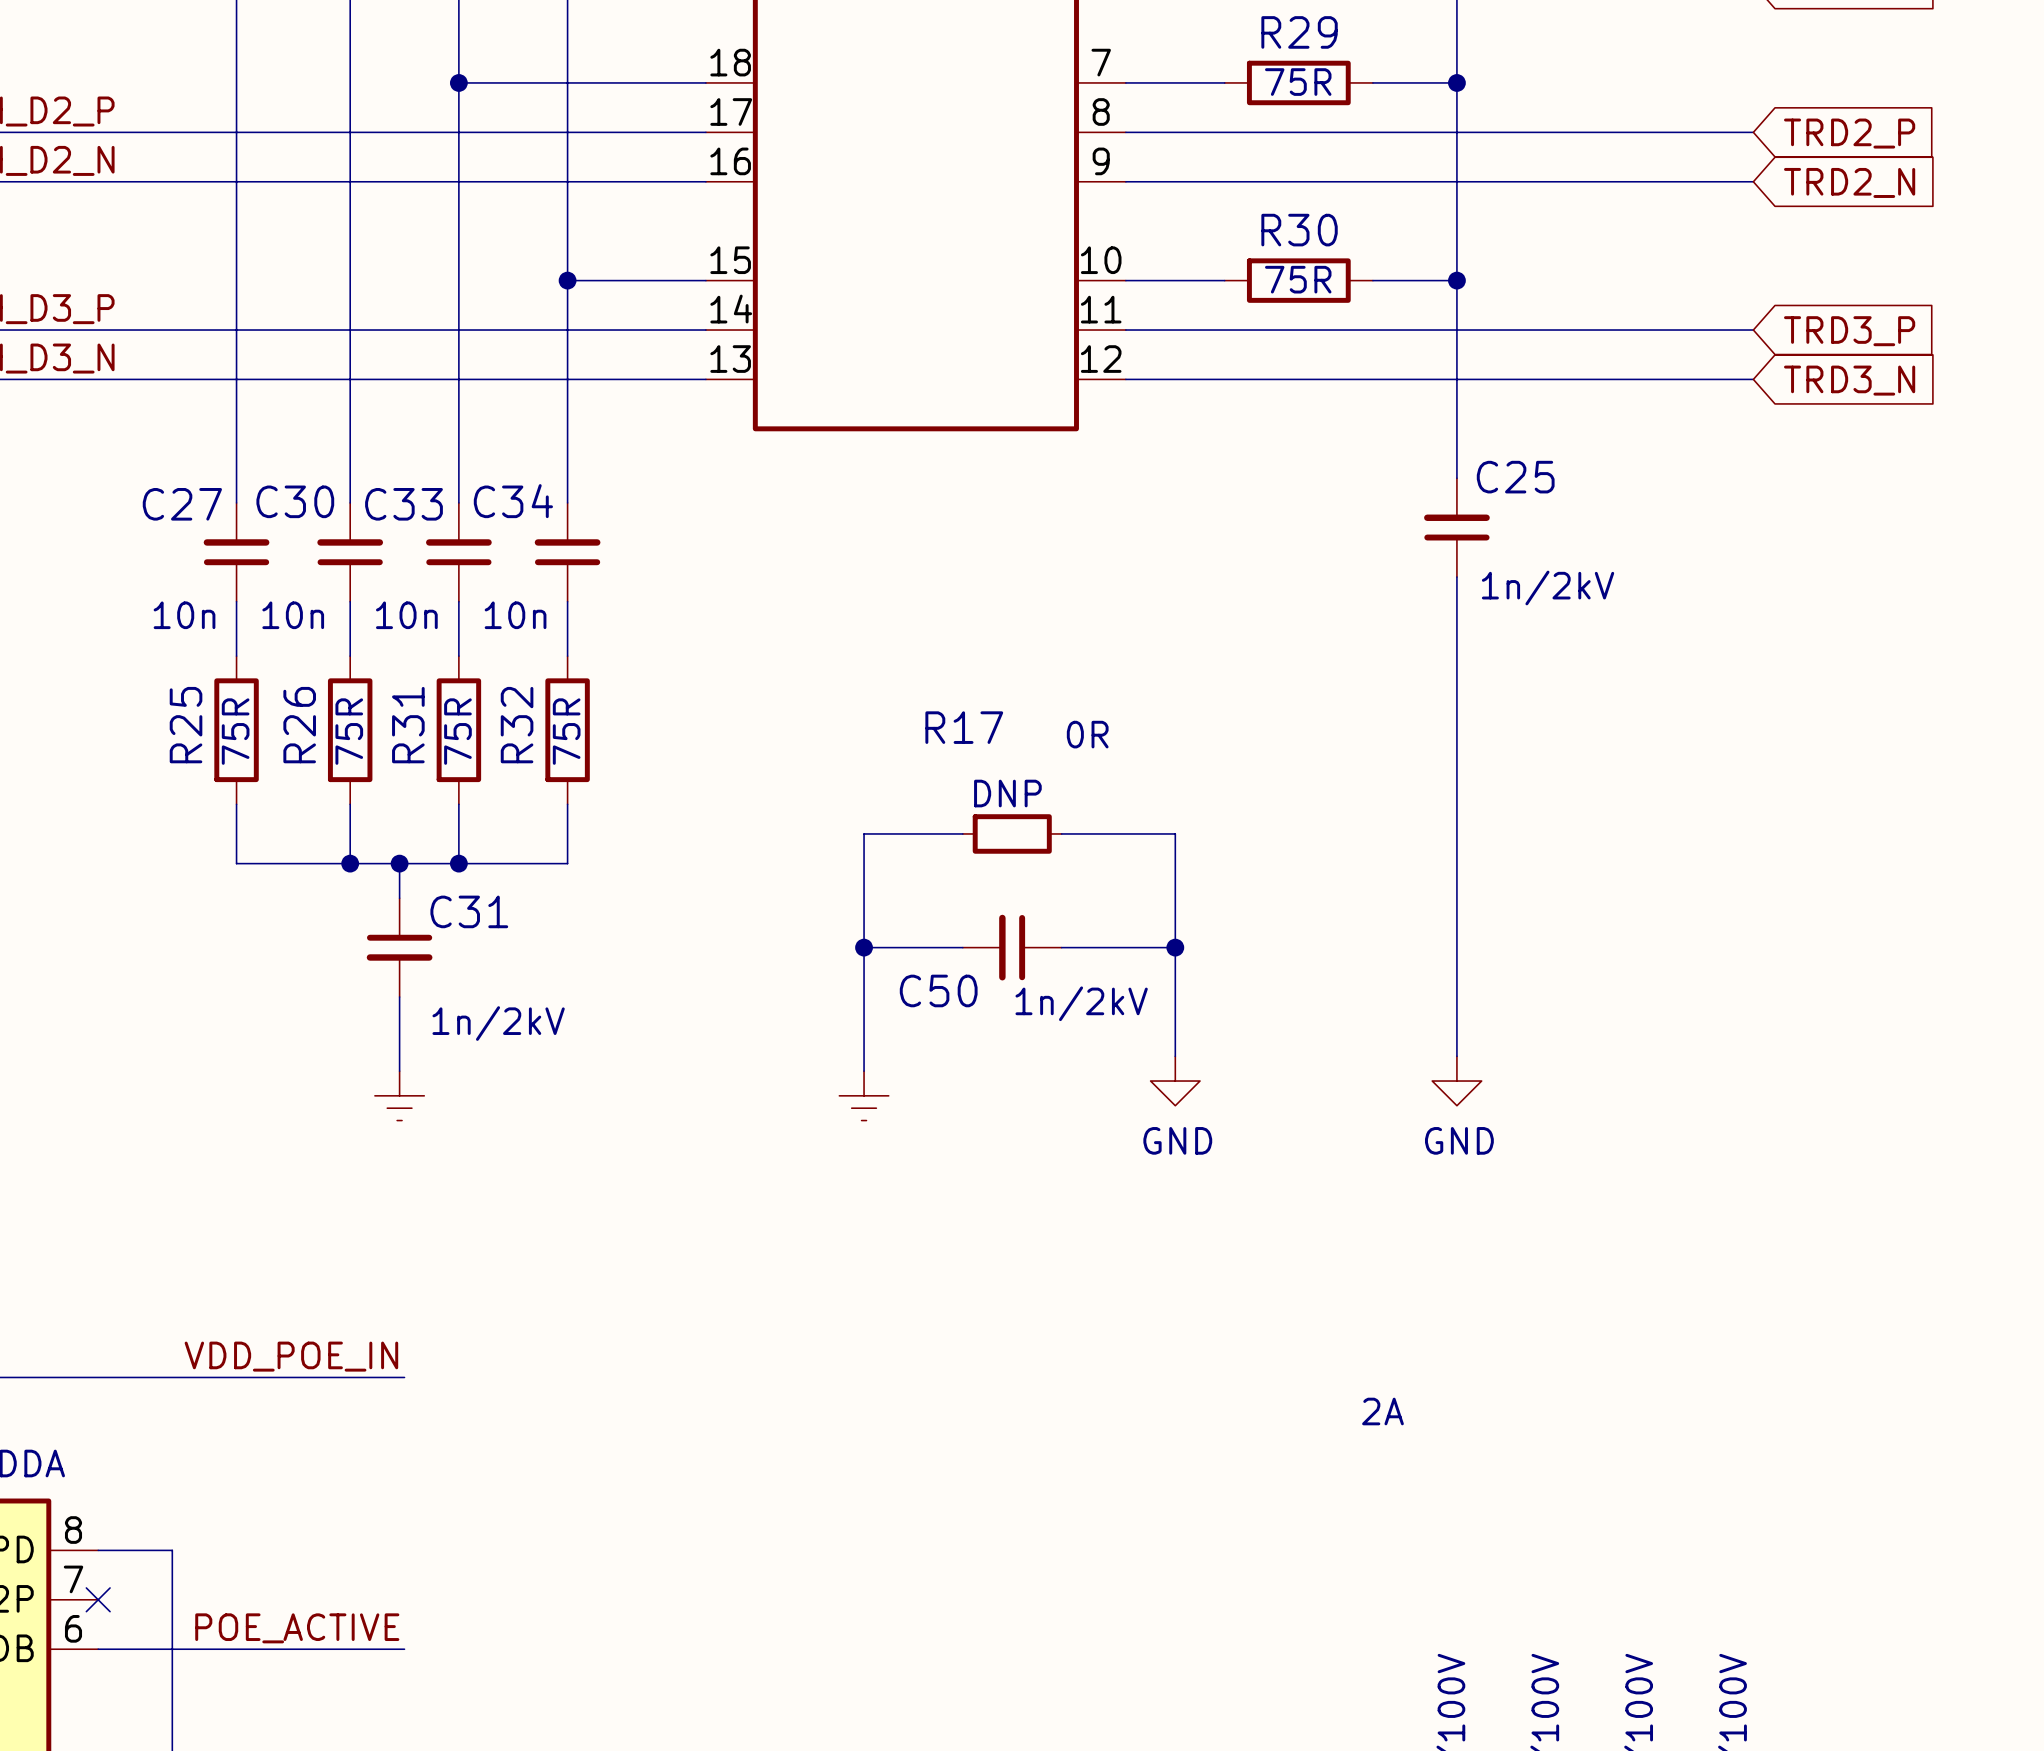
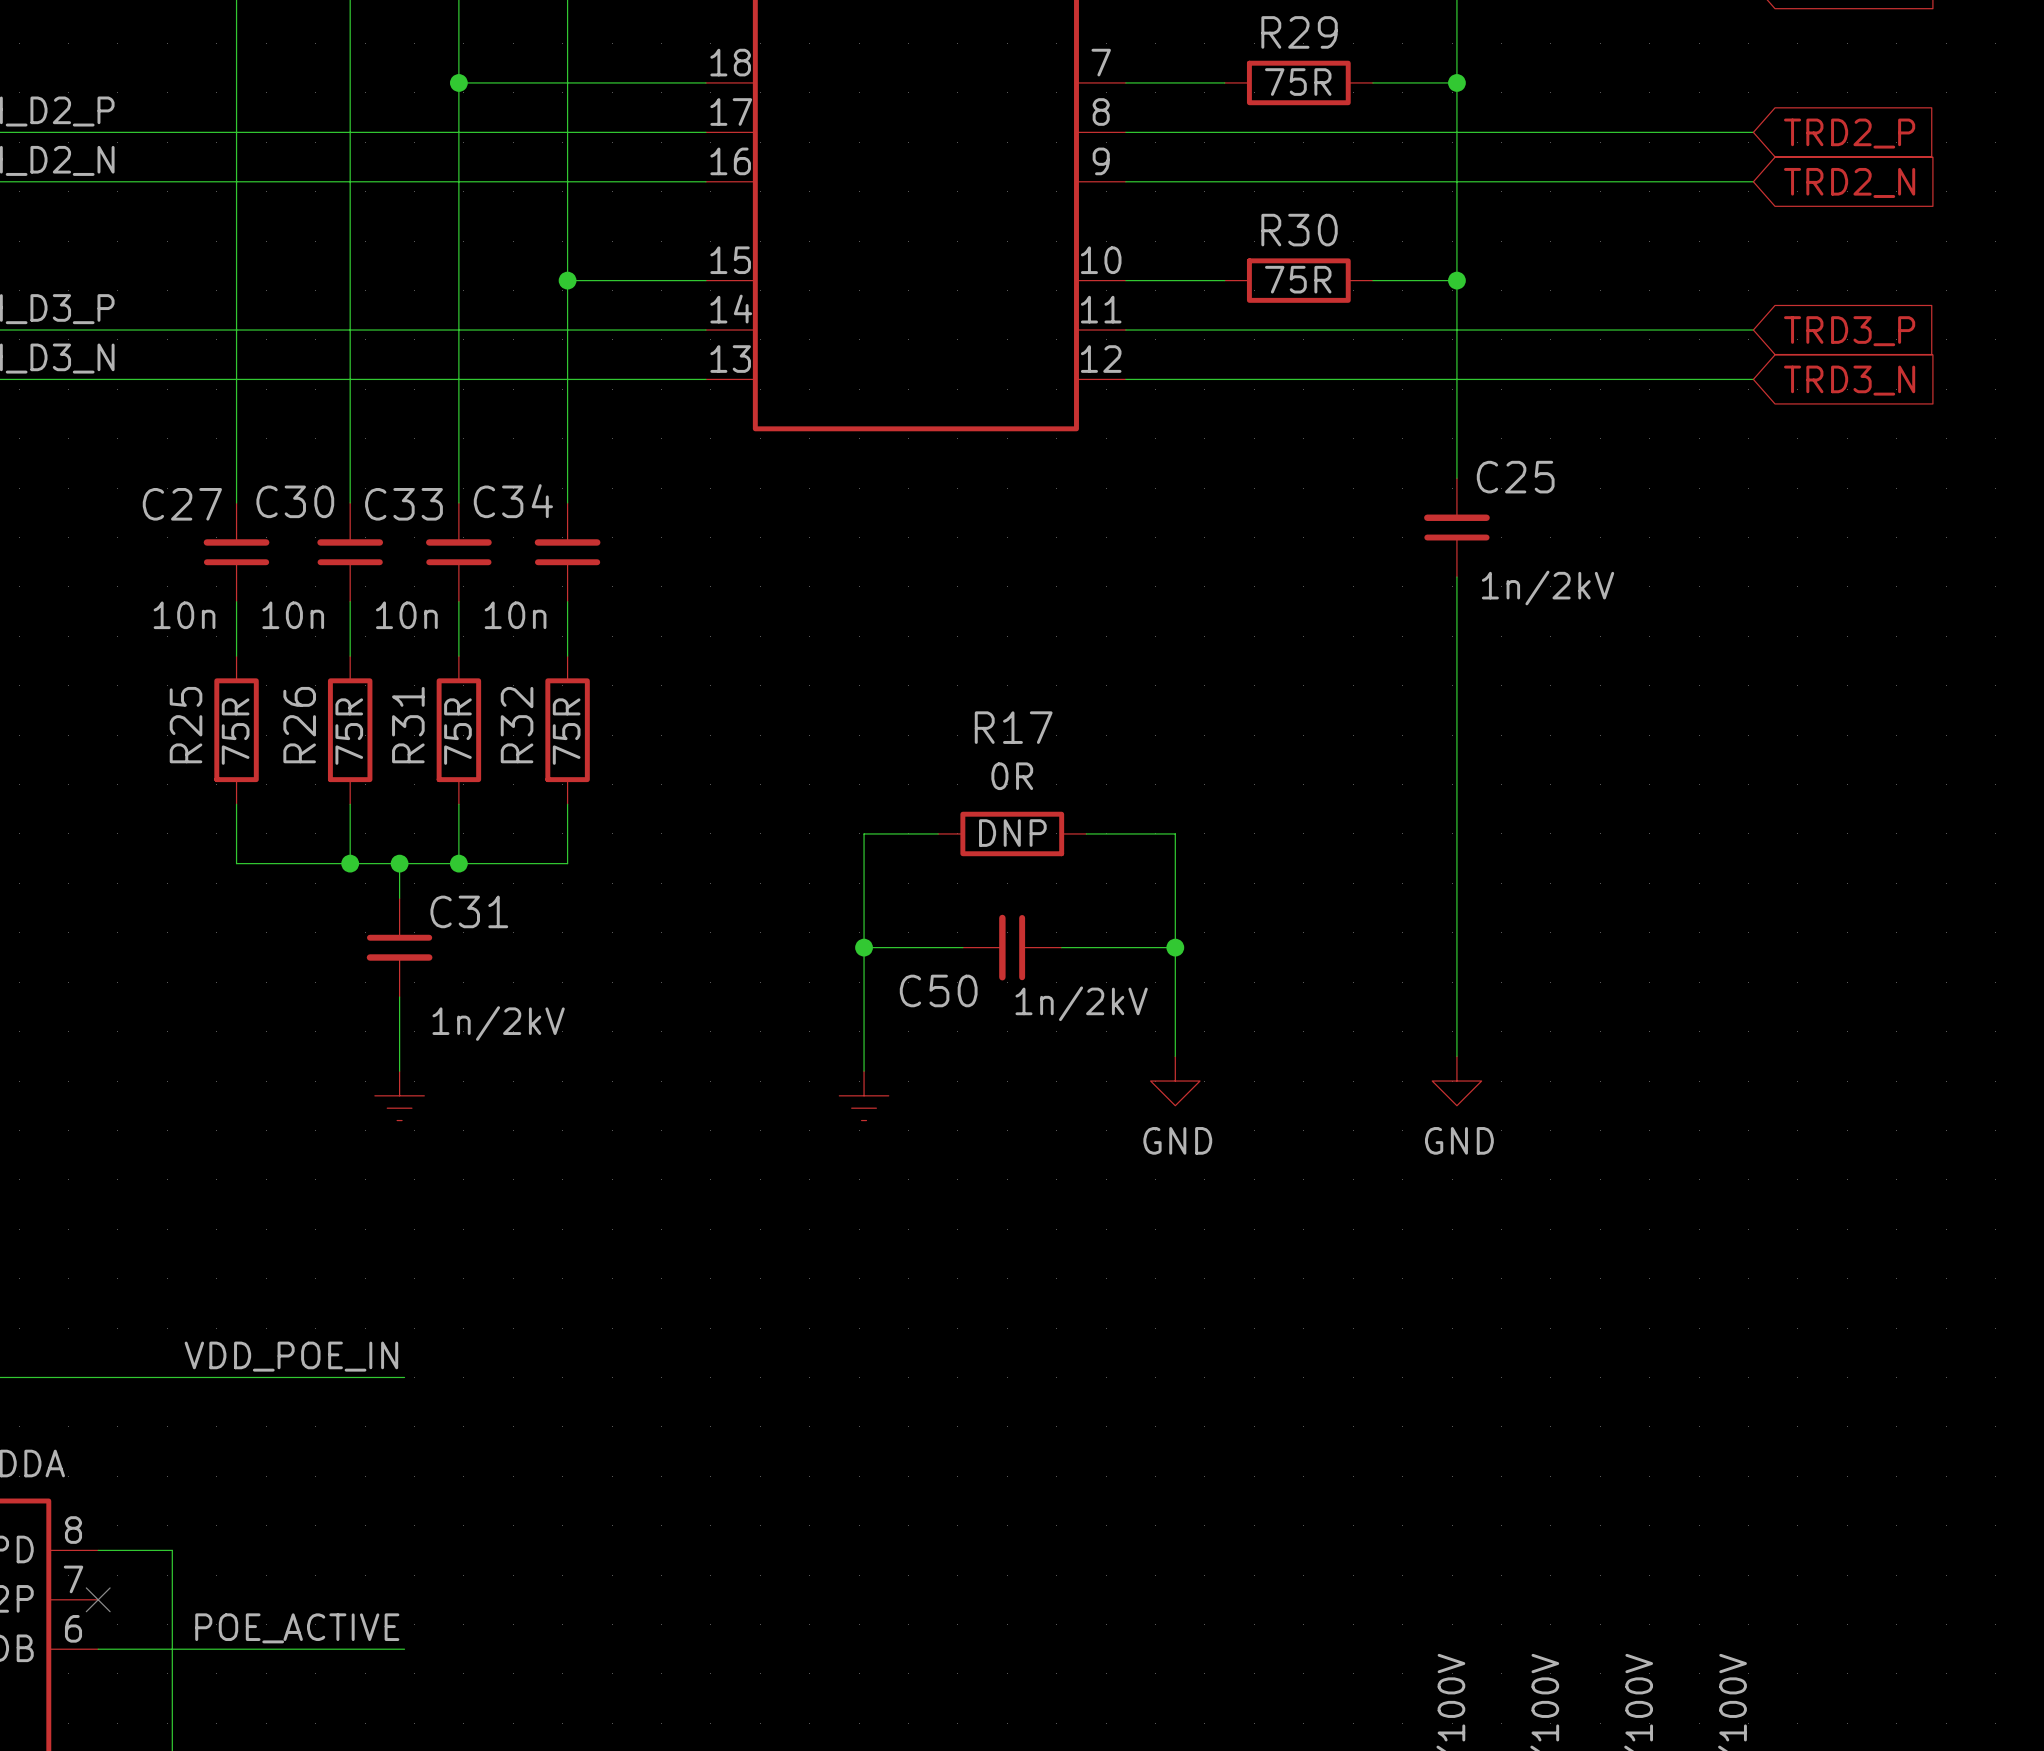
R17 name position: R17 (964, 727) -> R17 (1013, 727)
R17 text position: 0R (1087, 734) -> 0R (1012, 776)
R17 text position: DNP (1007, 793) -> DNP (1012, 833)
R17 symbol: [962, 814, 1062, 854] -> [938, 811, 1087, 857]
R17 text: 2A (1382, 1411) -> none

